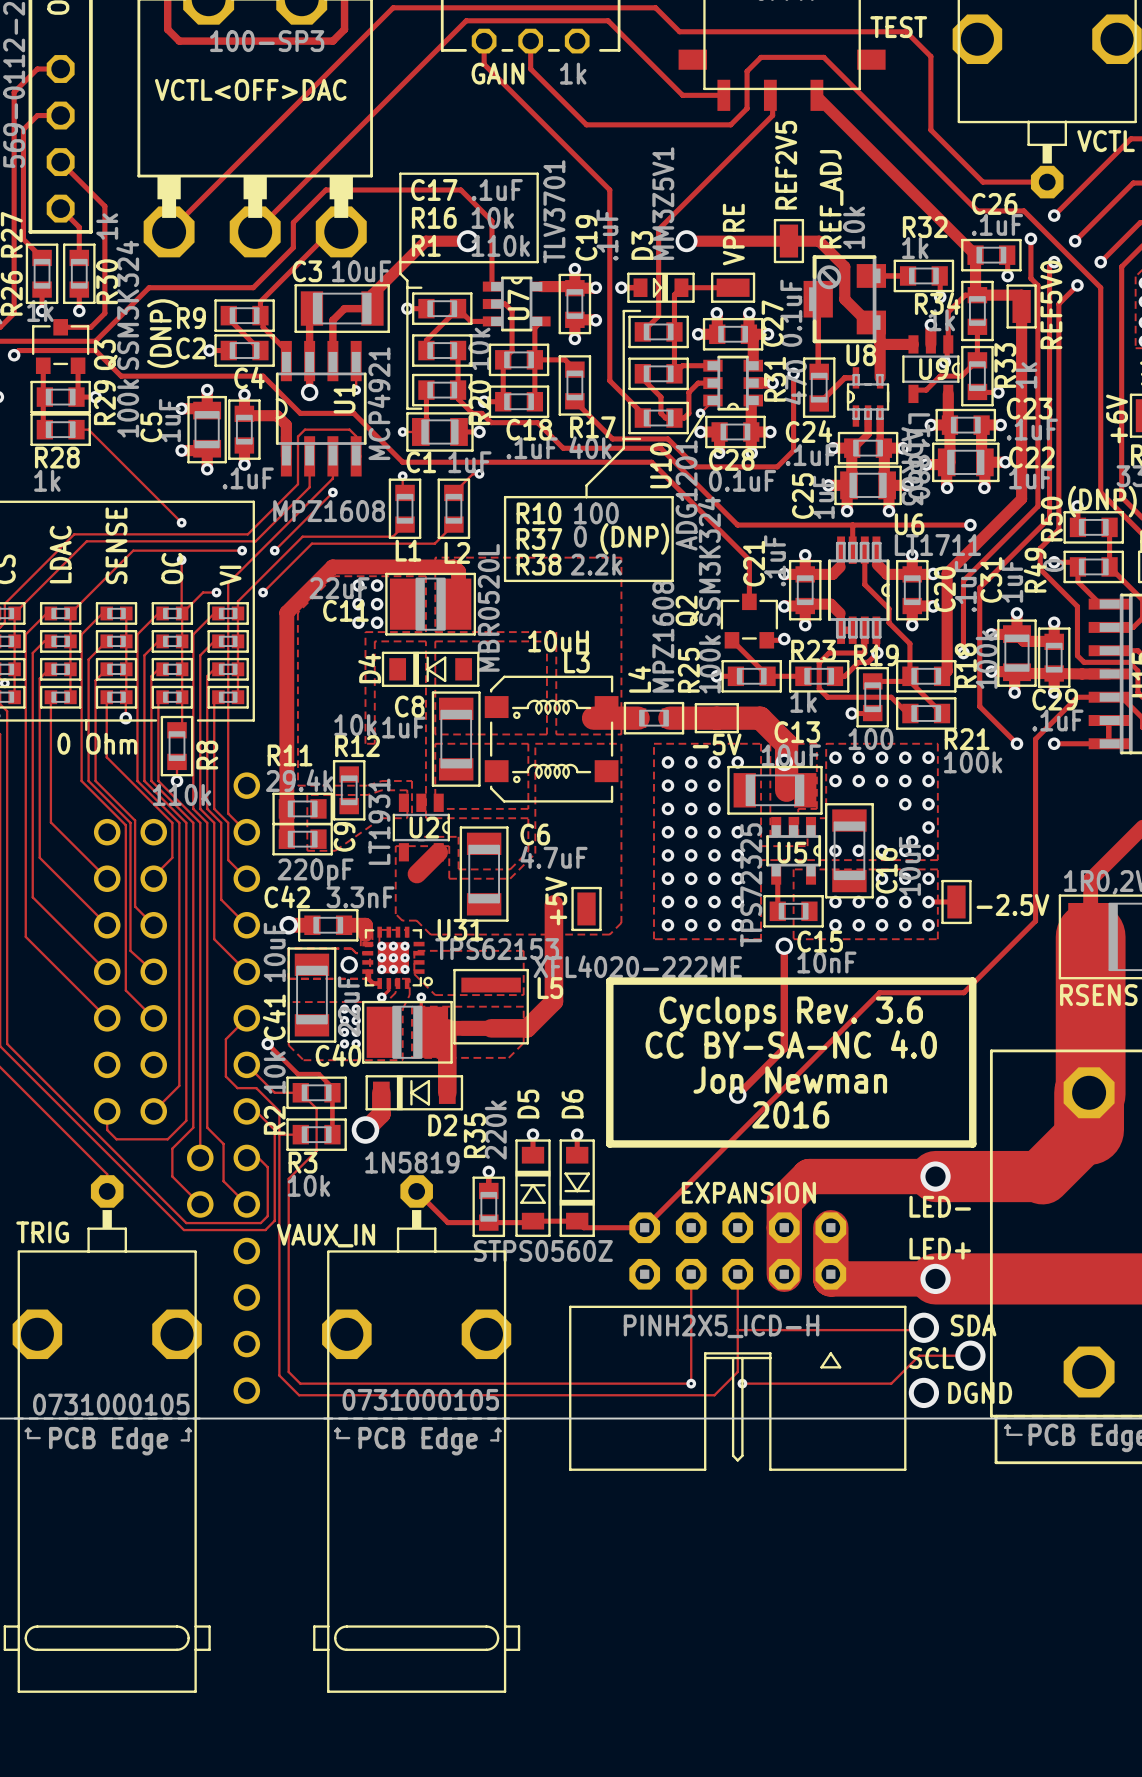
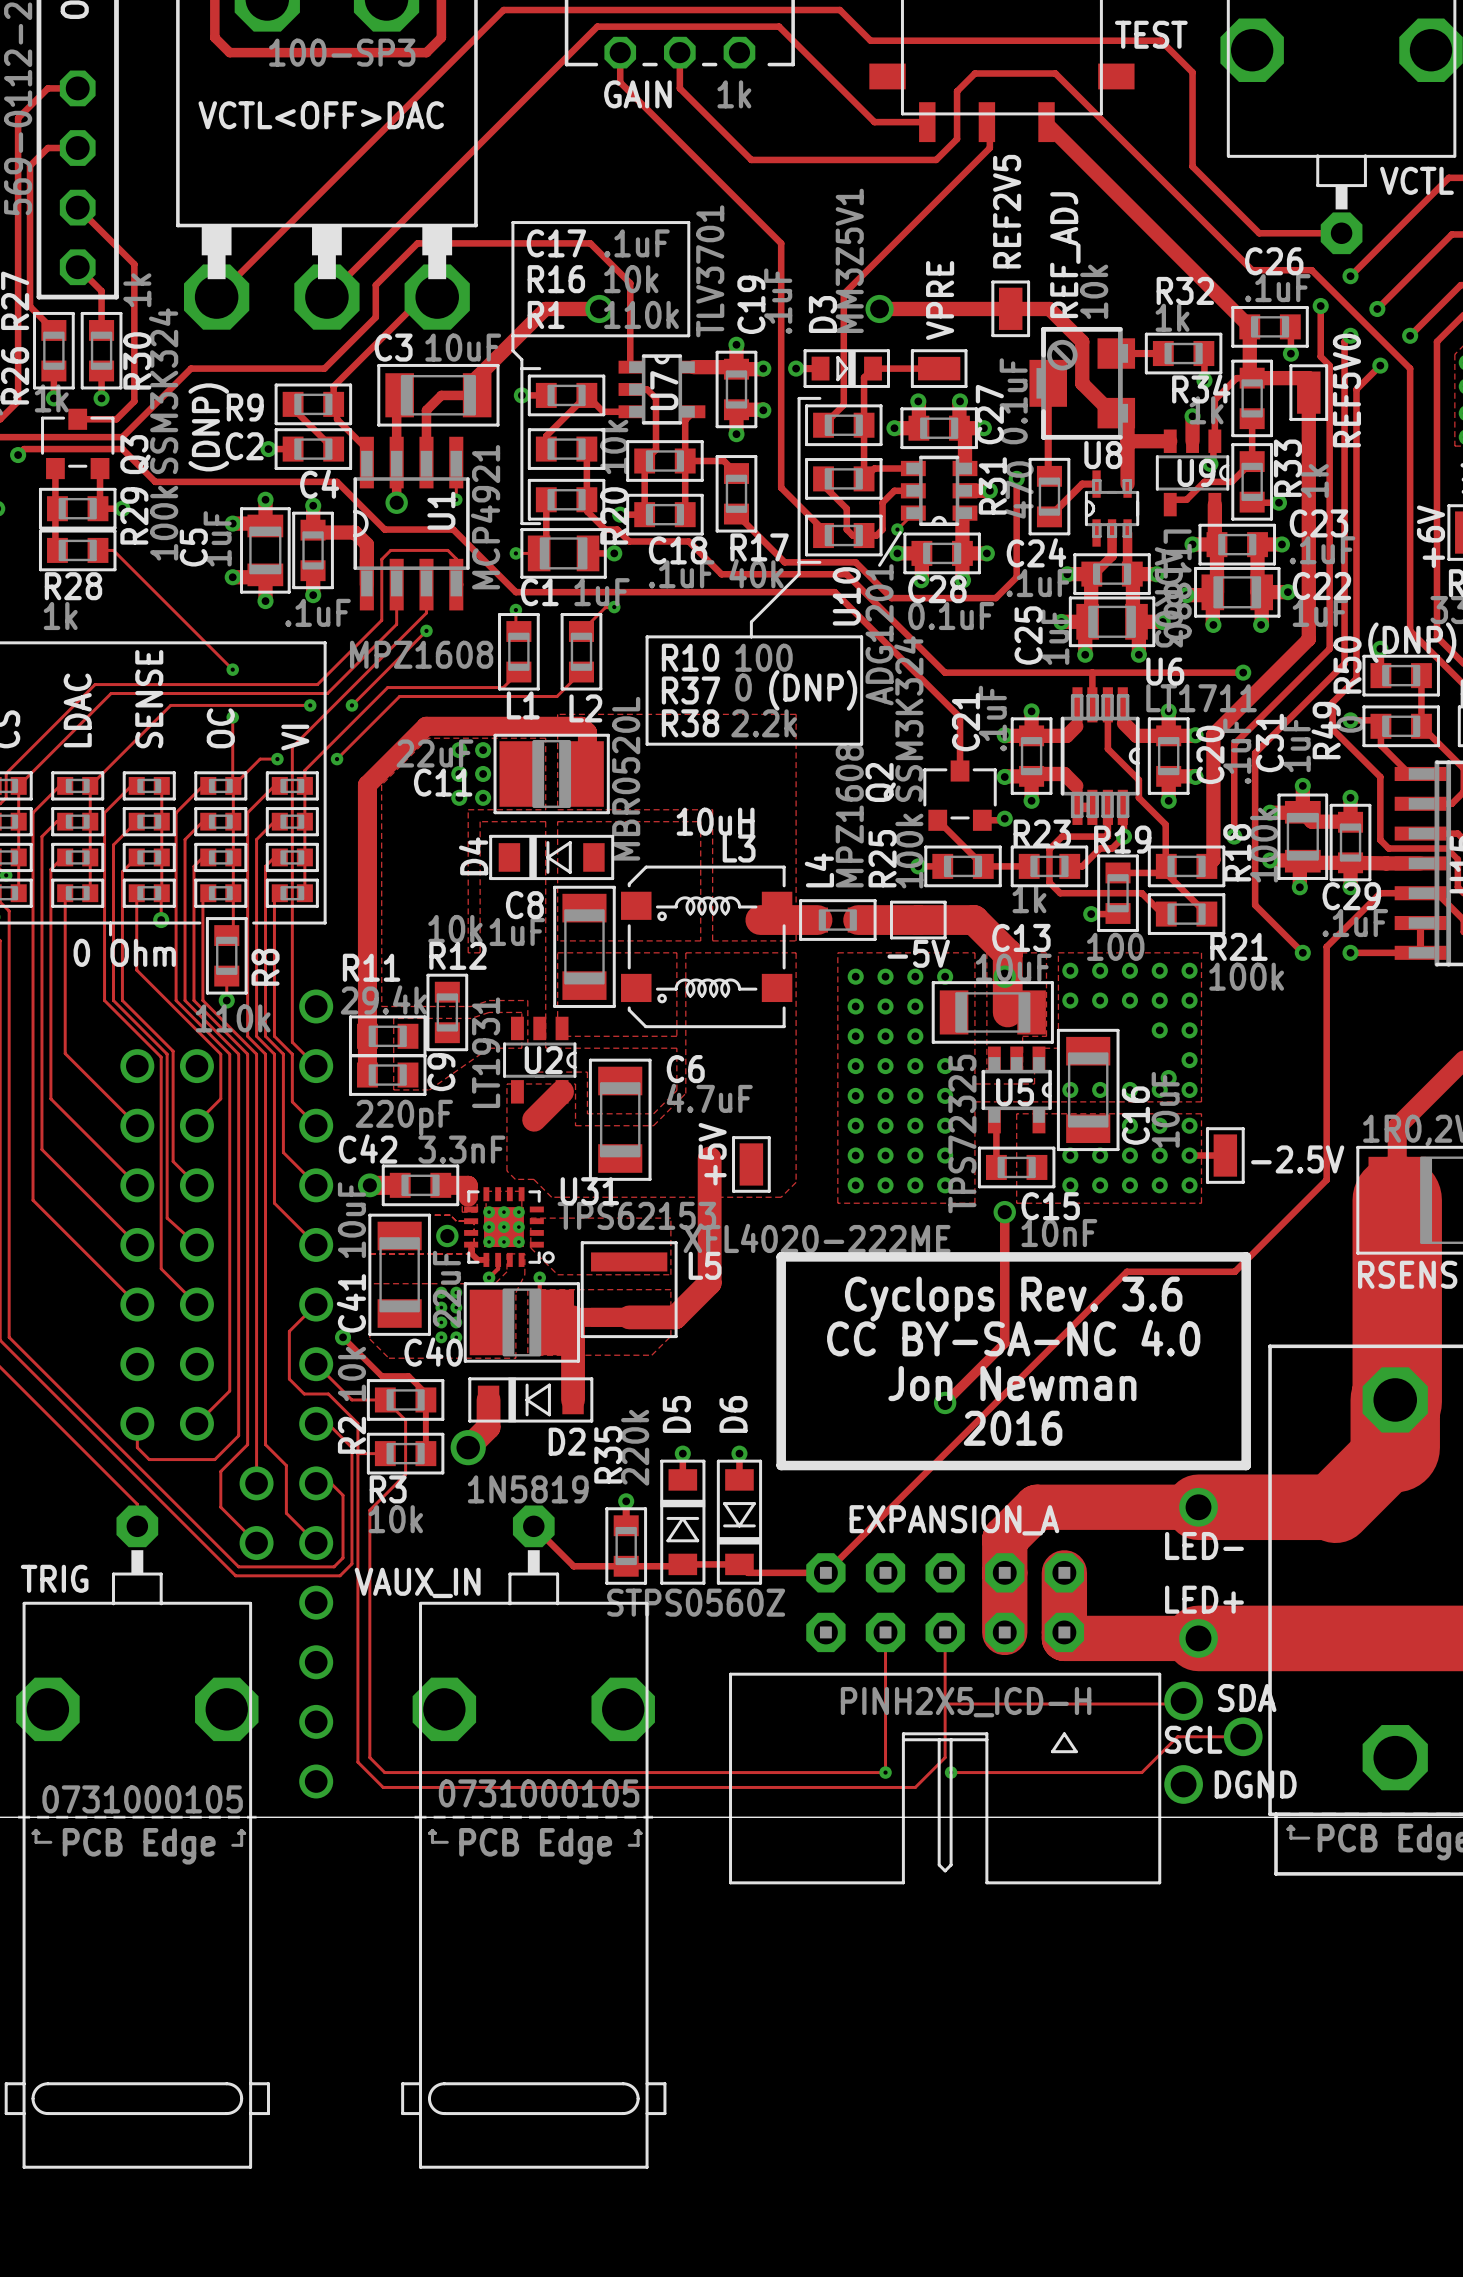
EXPANSION name: EXPANSION (748, 1192) -> EXPANSION_A (954, 1520)
EXPANSION value position: PINH2X5_ICD-H (721, 1326) -> PINH2X5_ICD-H (966, 1702)

